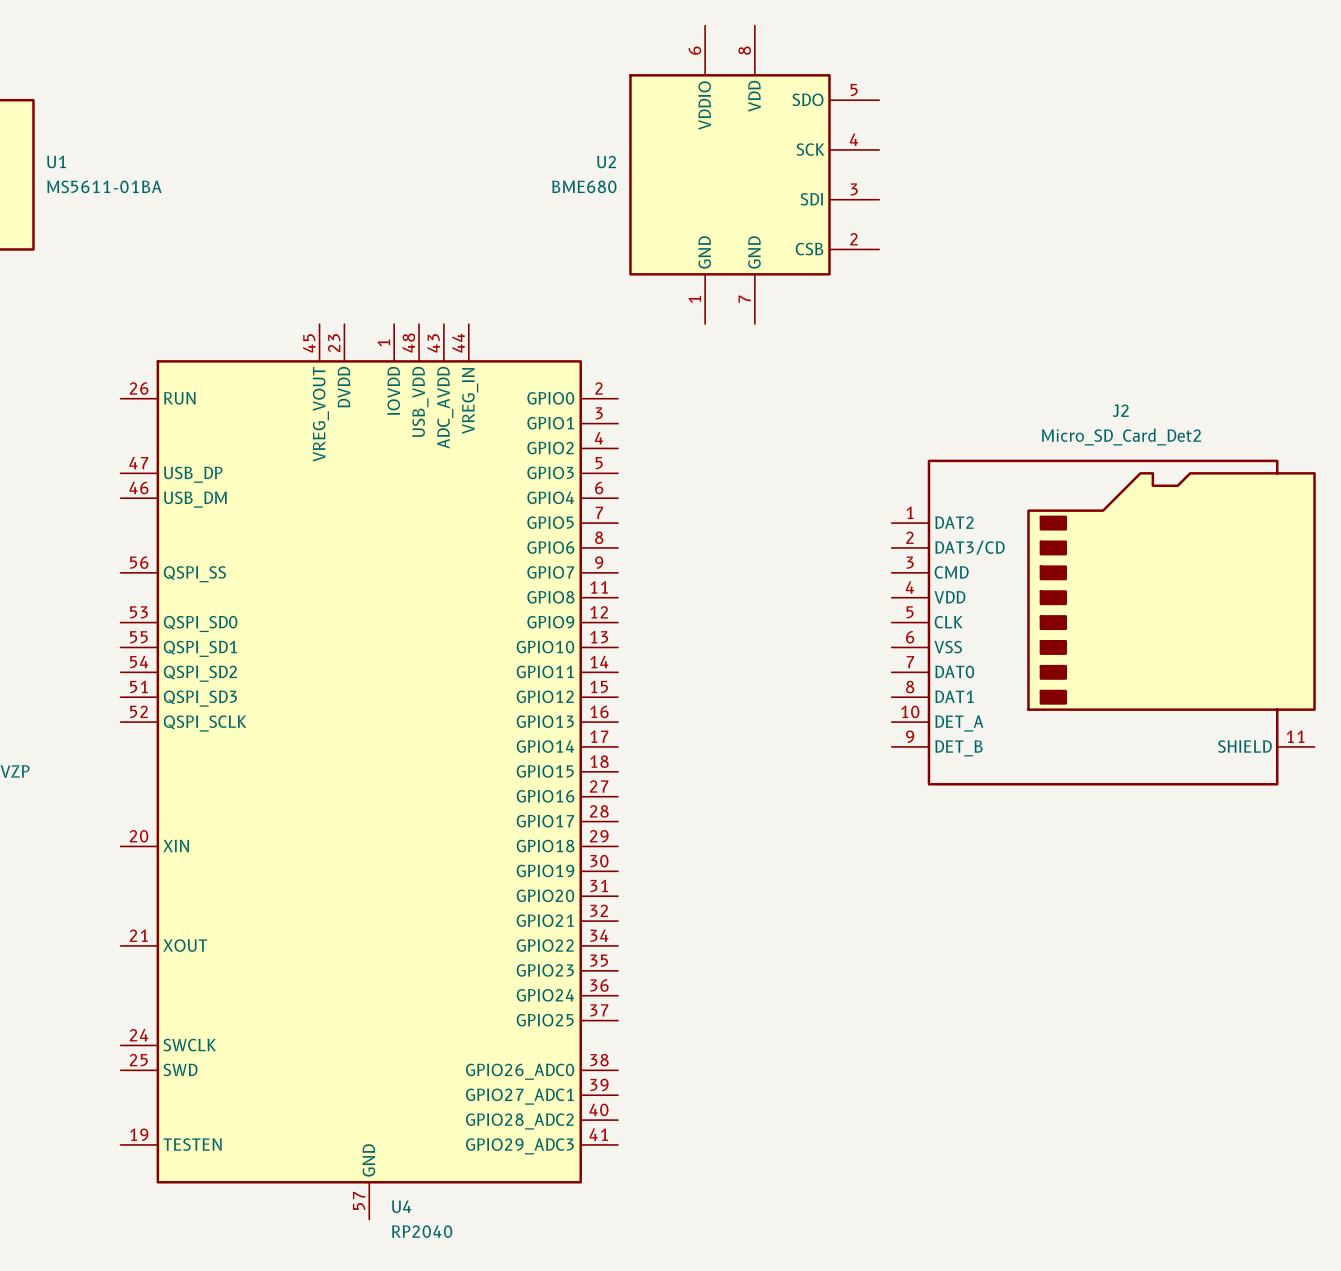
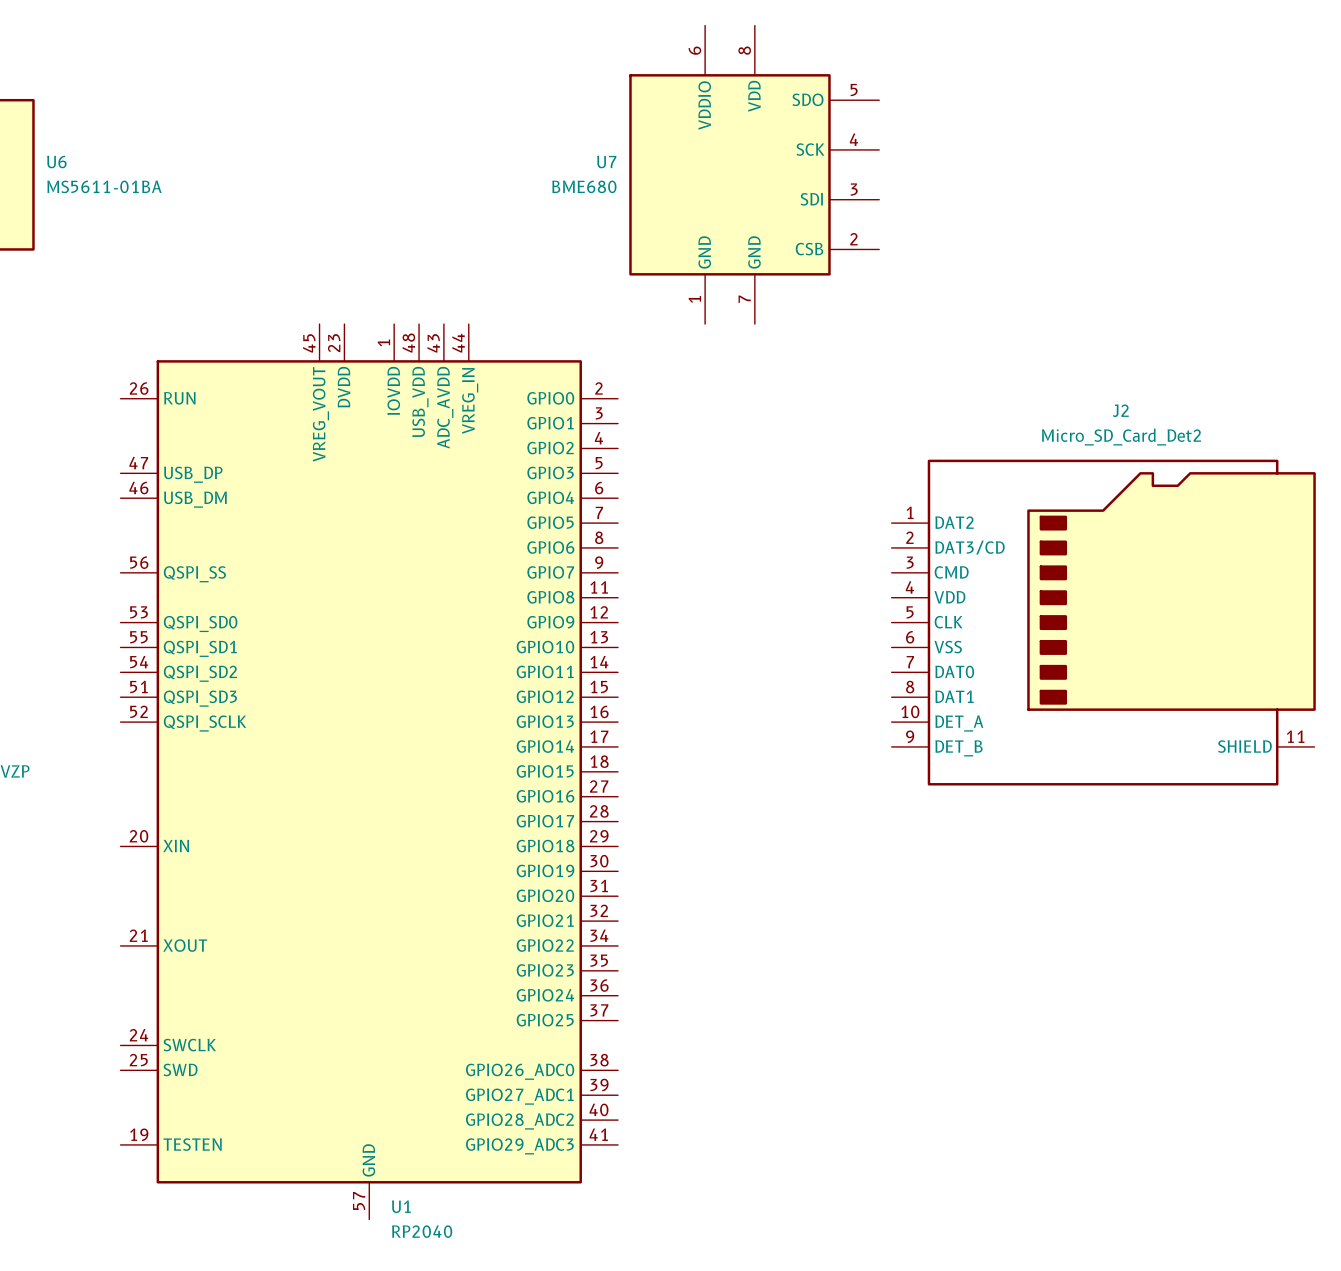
U1 name: U1 (56, 162) -> U6 (56, 162)
U2 name: U2 (606, 162) -> U7 (606, 162)
U4 name: U4 (401, 1206) -> U1 (401, 1206)

